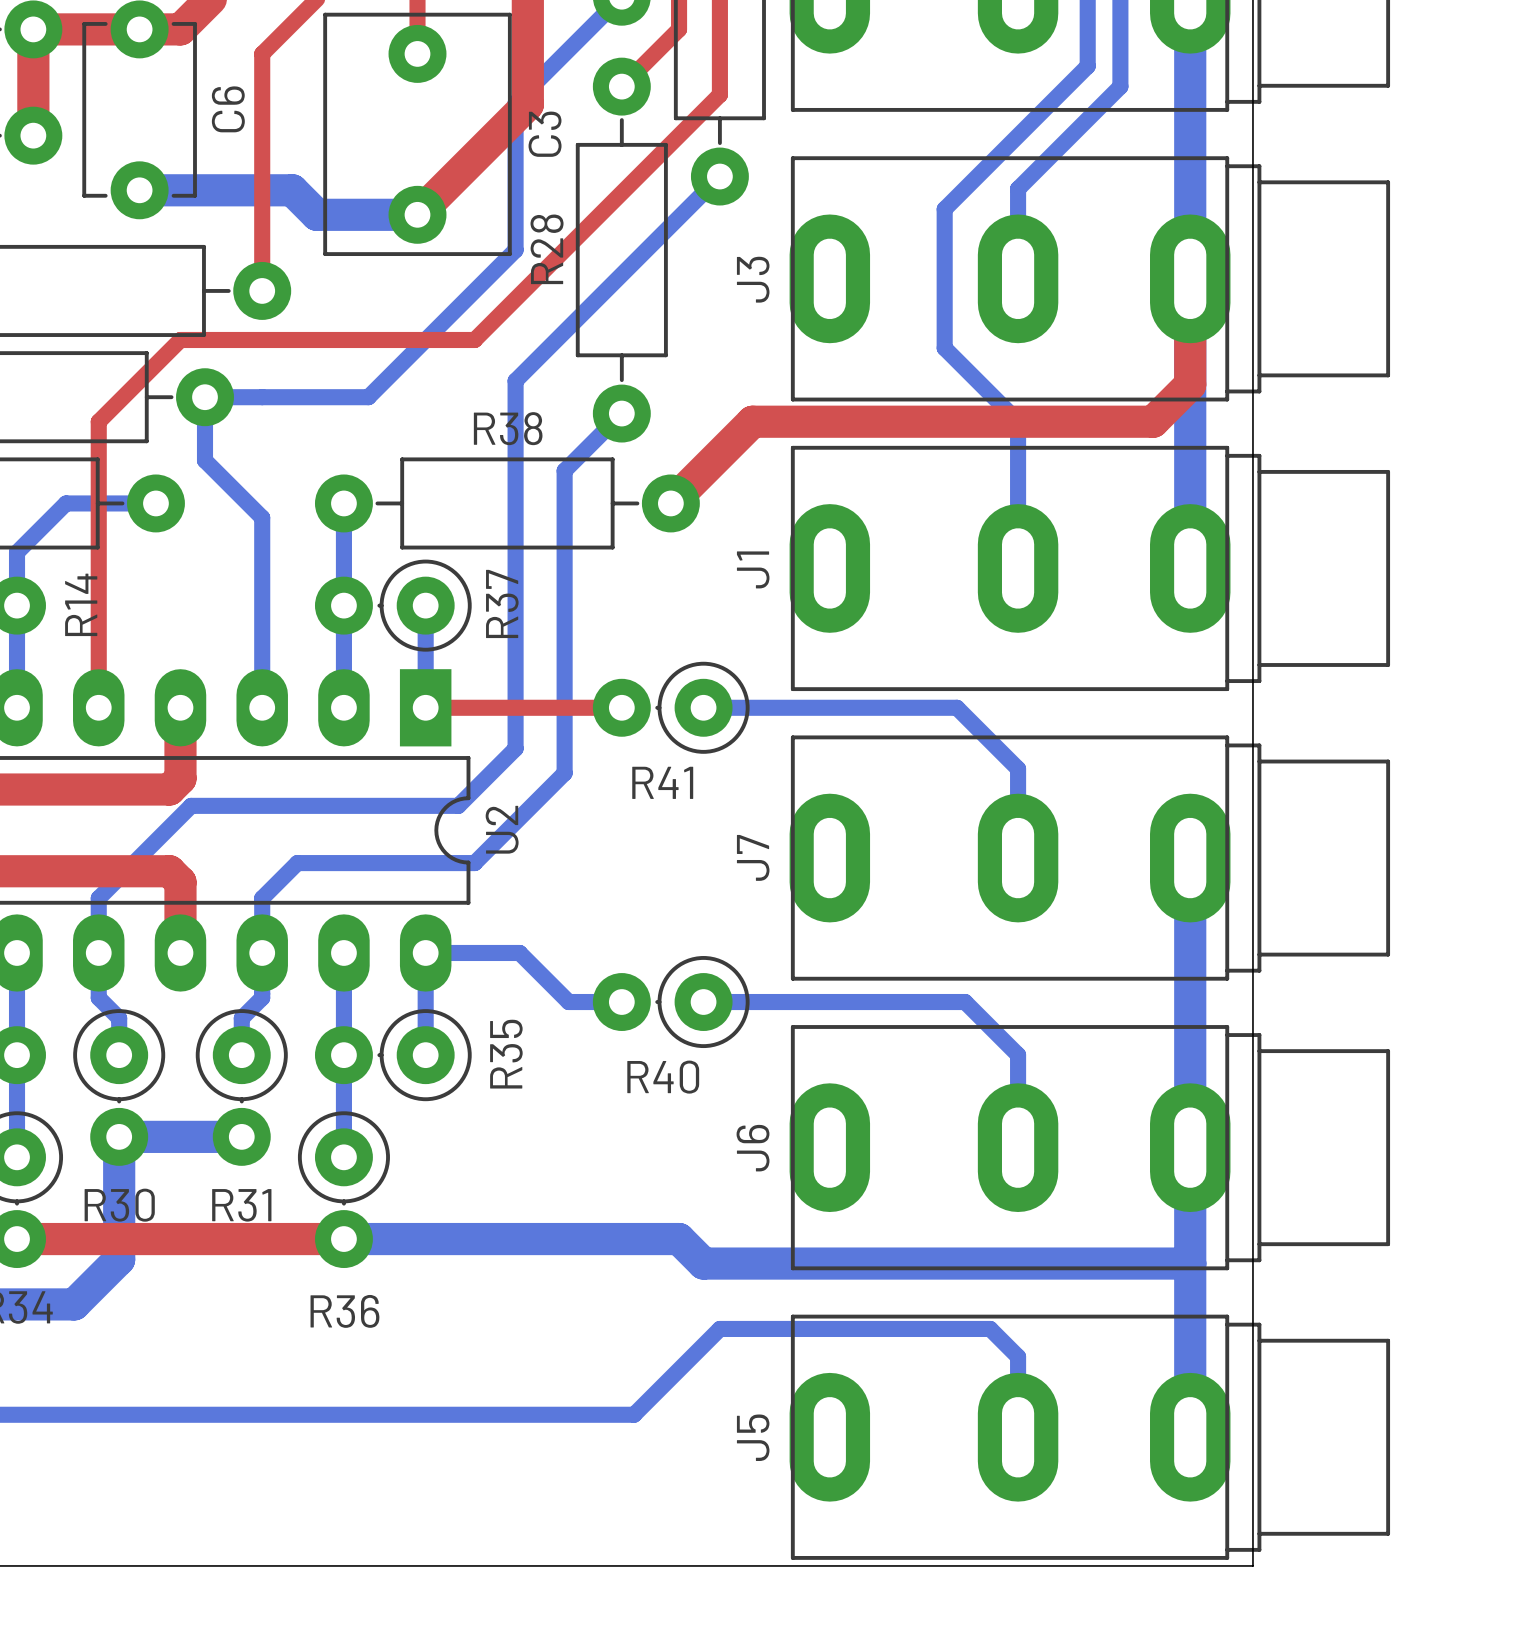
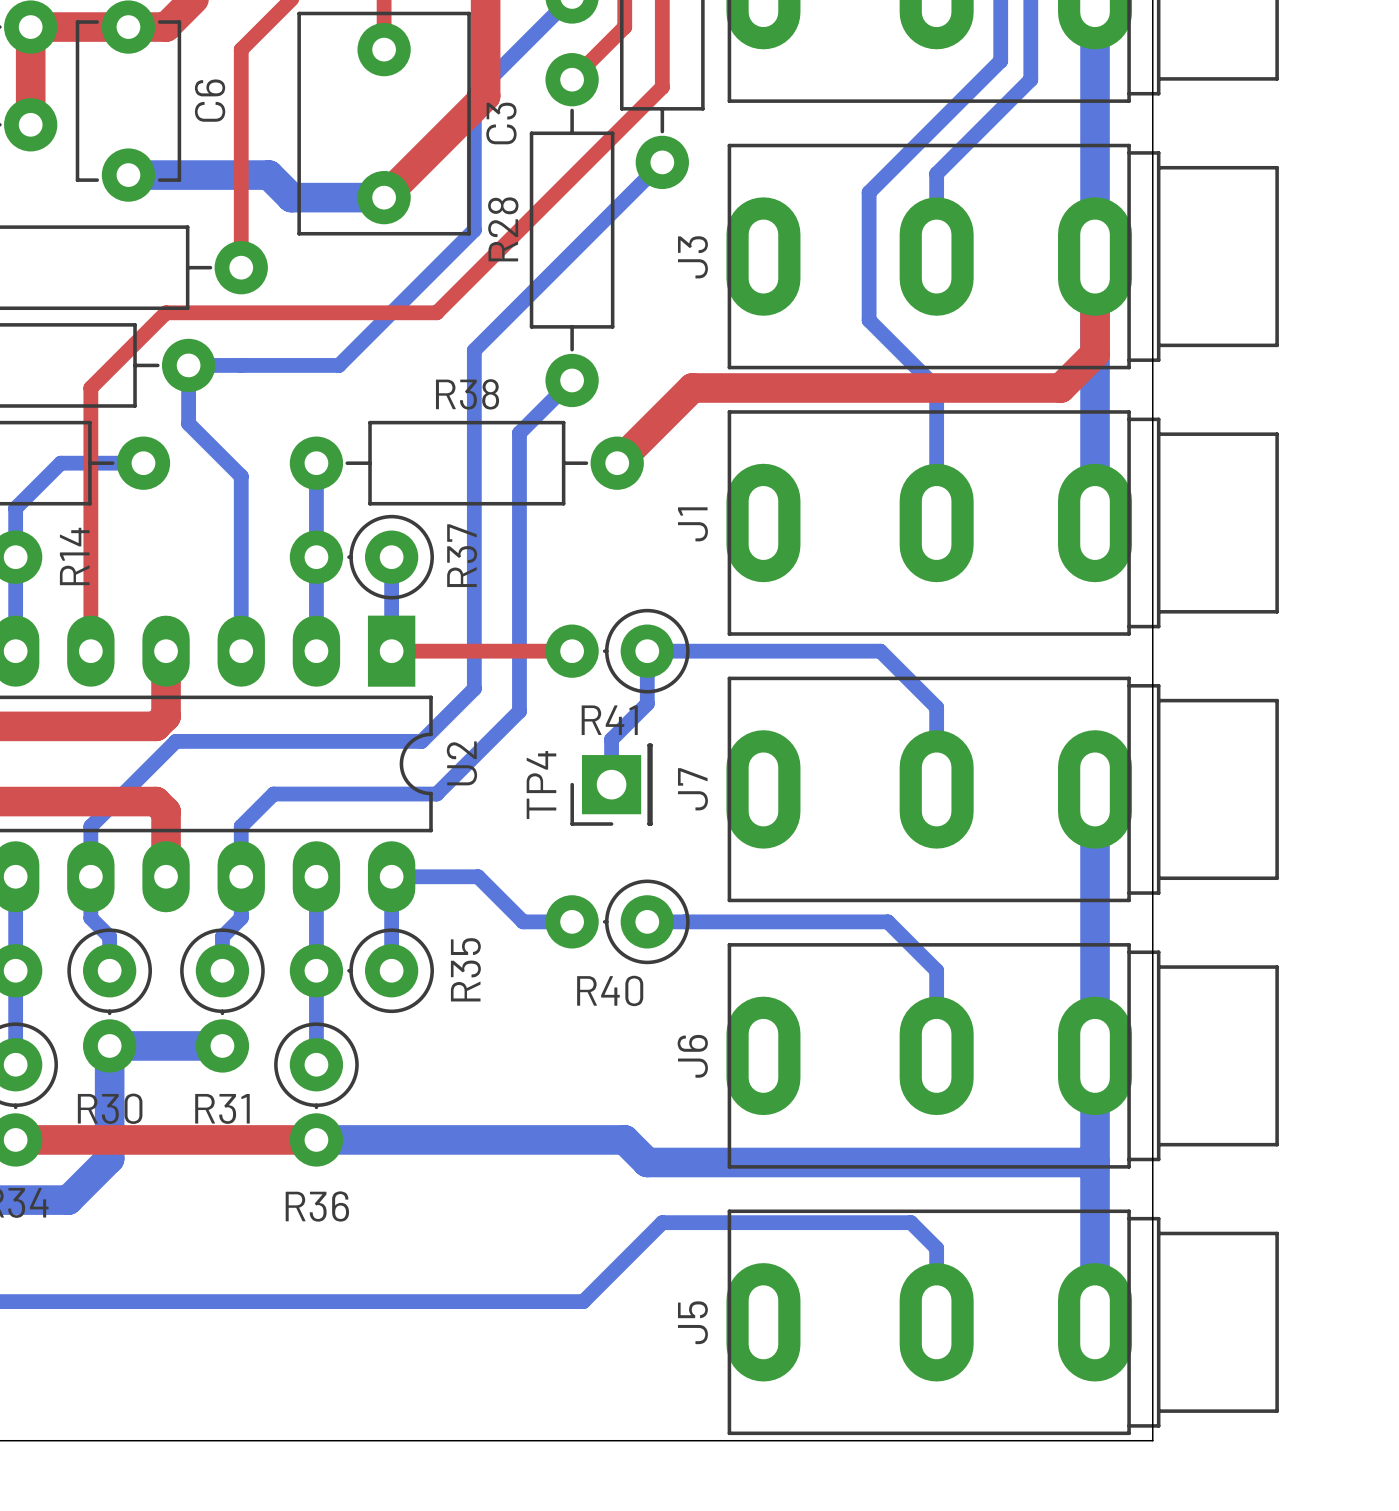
bottom track: none -> (647, 651) (647, 703) (611, 739) (611, 784)
TP4: none -> (611, 784)

